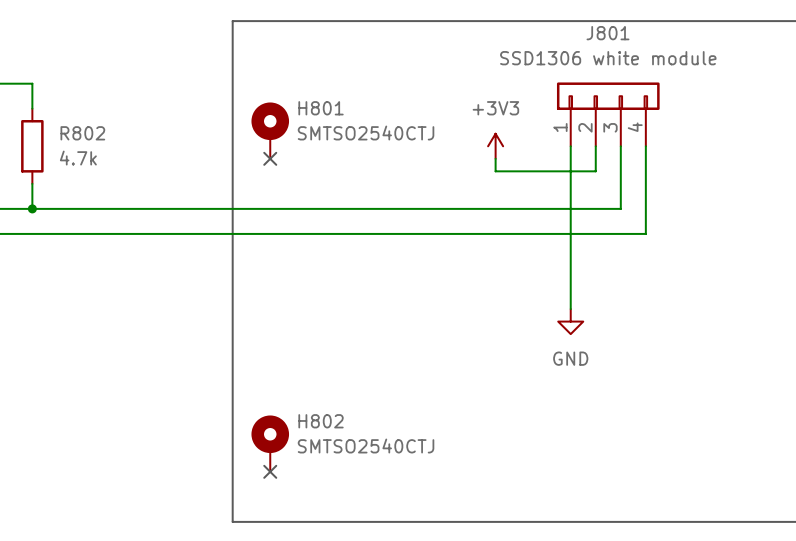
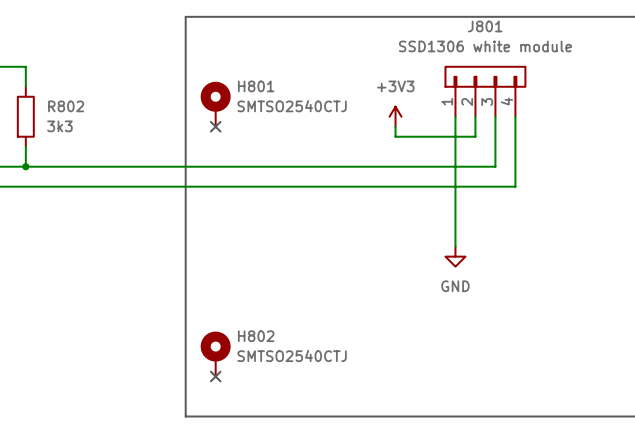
R802 value: 4.7k (78, 158) -> 3k3 (59, 126)

